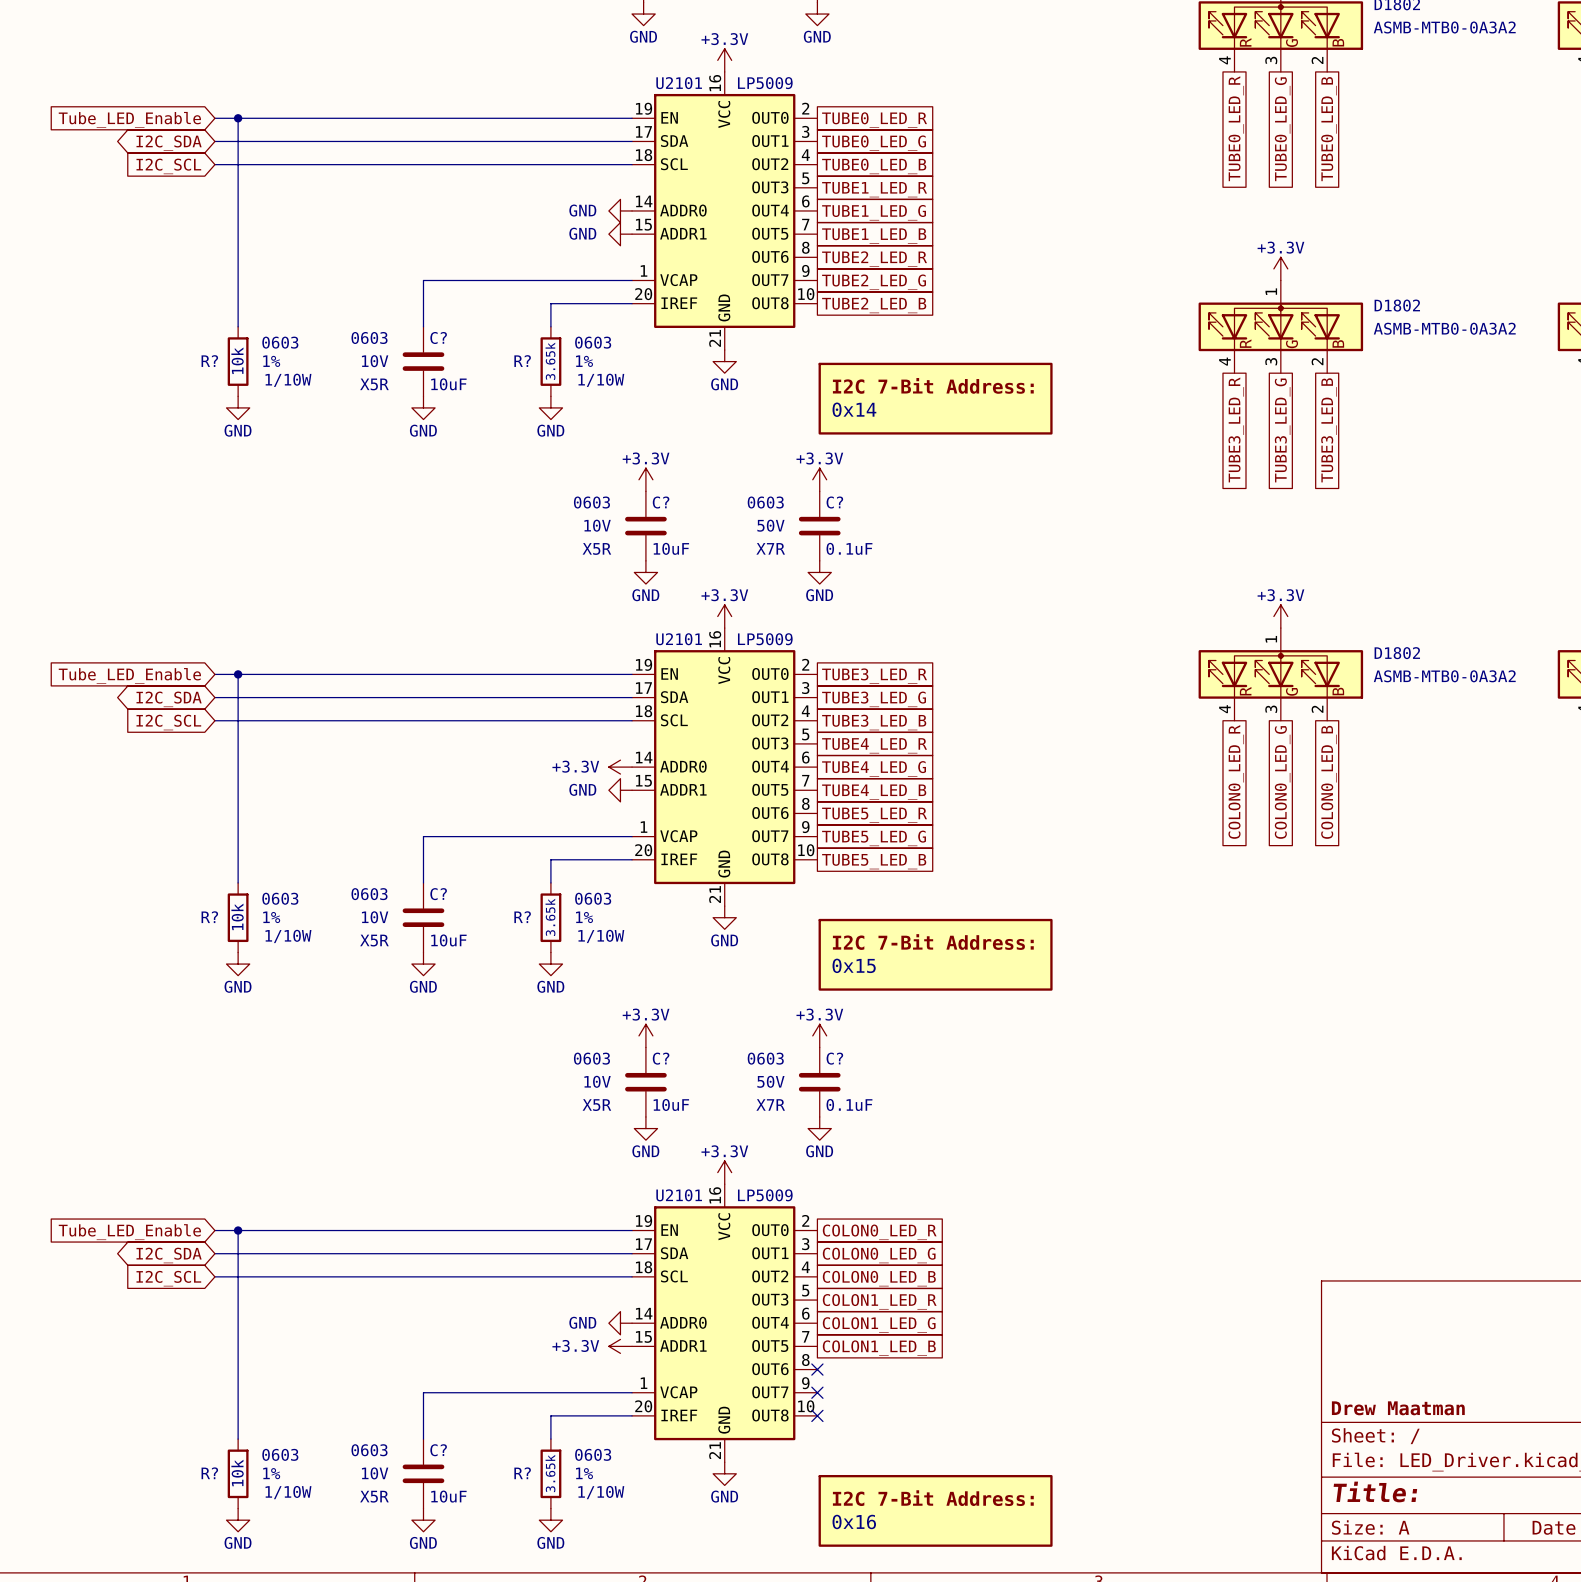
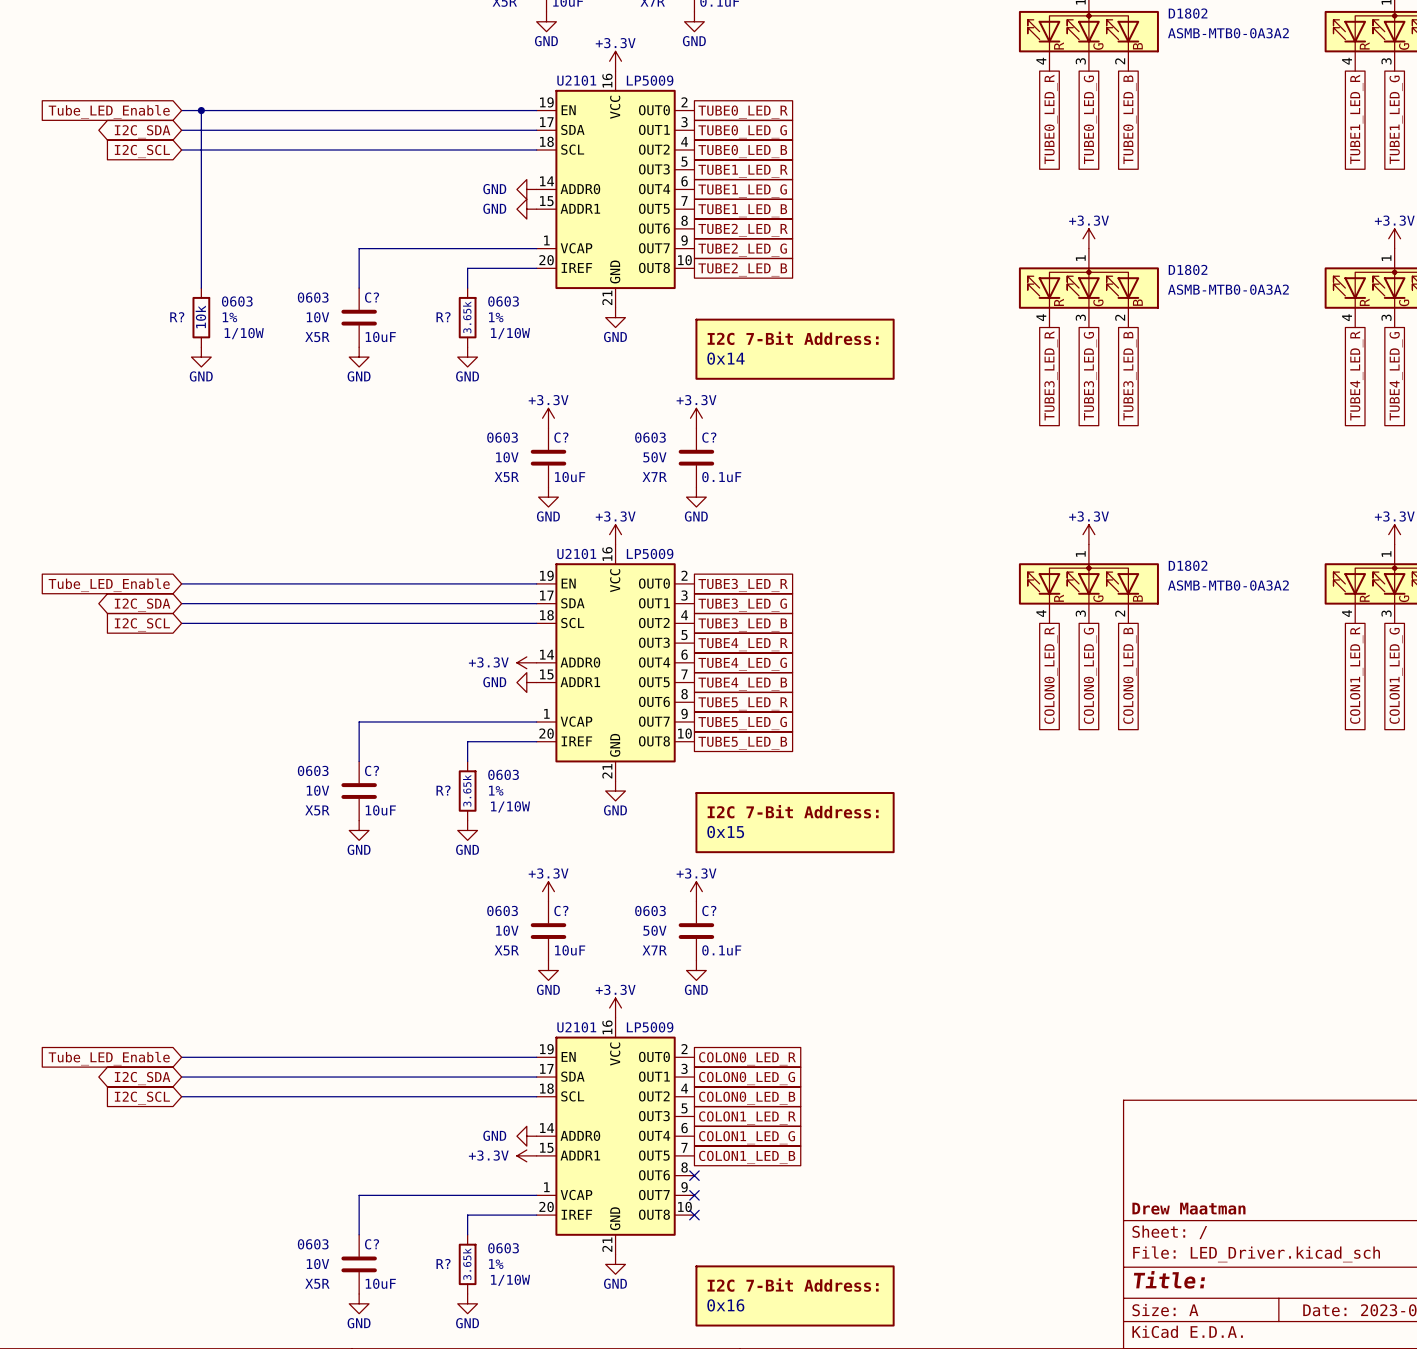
wire: (238, 674) (238, 882) -> none
junction: (238, 674) -> none
R?: 10k (238, 917) -> none
power symbol: GND (238, 964) -> none
wire: (238, 1230) (238, 1439) -> none
junction: (238, 1230) -> none
R?: 10k (238, 1473) -> none
power symbol: GND (238, 1520) -> none

